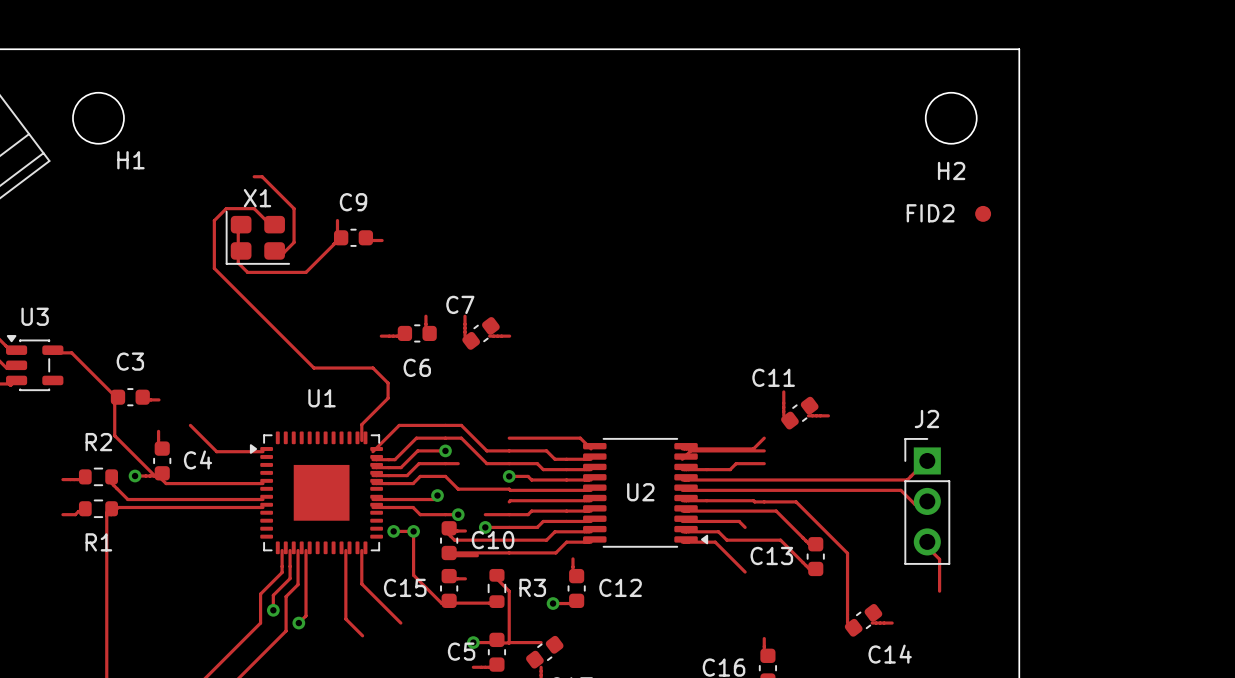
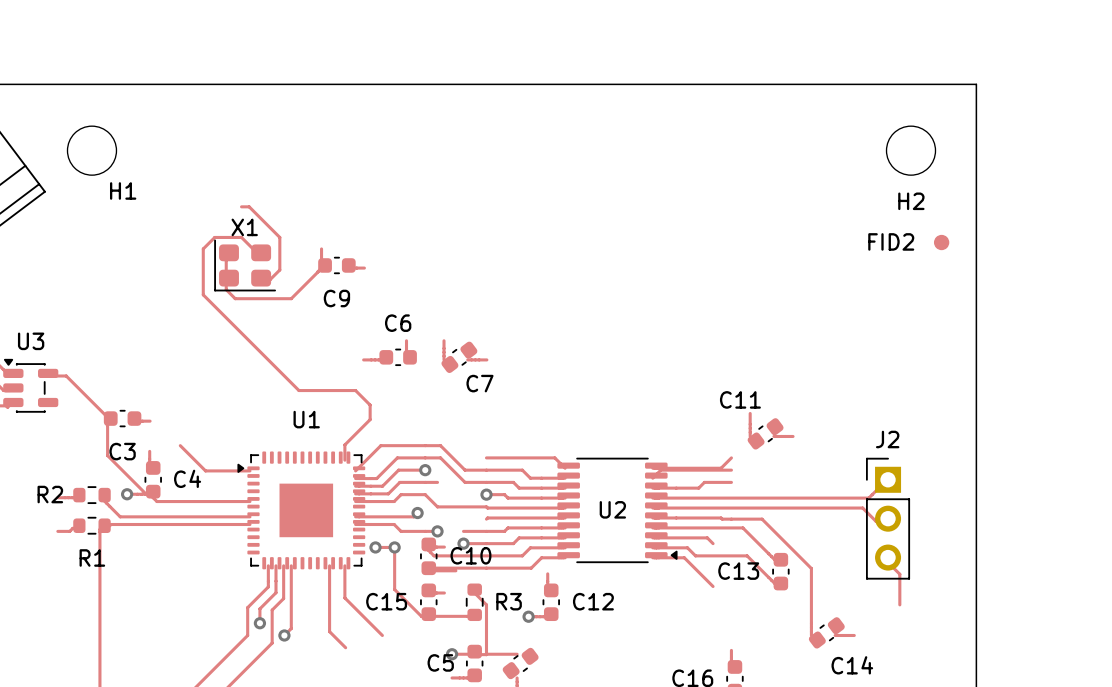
C9 name position: C9 (353, 202) -> C9 (336, 298)
C7 name position: C7 (460, 304) -> C7 (479, 383)
C3 name position: C3 (130, 361) -> C3 (122, 451)
C6 name position: C6 (417, 367) -> C6 (398, 323)
R2 name position: R2 (98, 442) -> R2 (50, 494)

